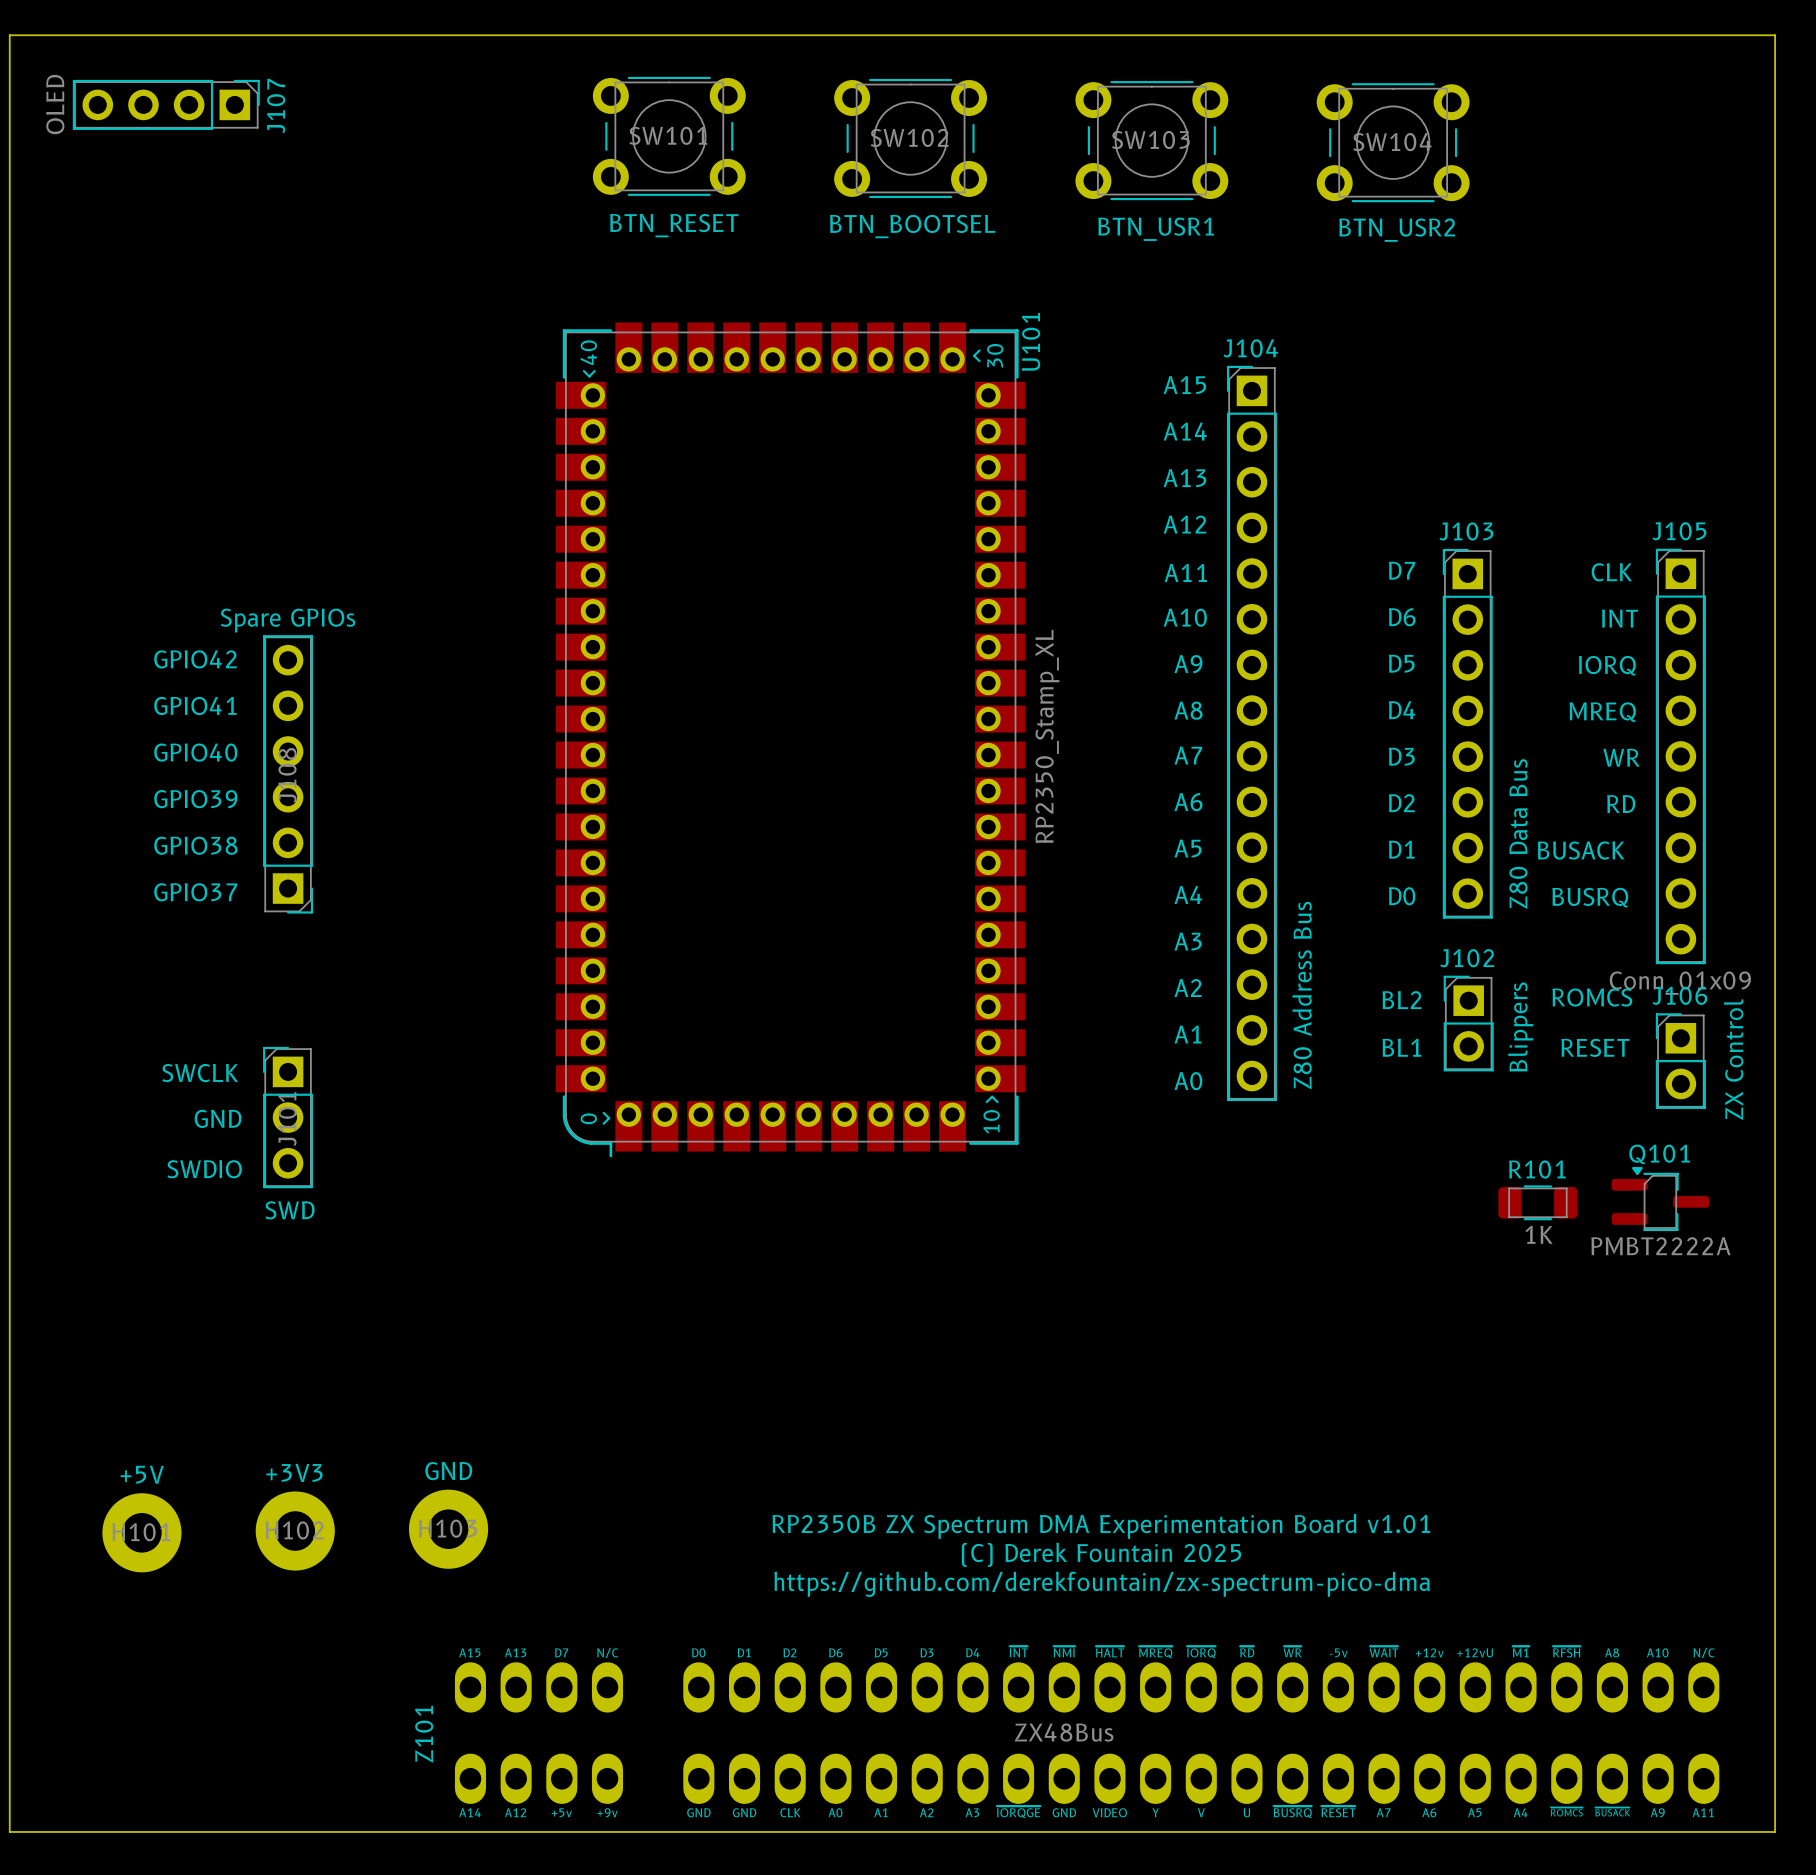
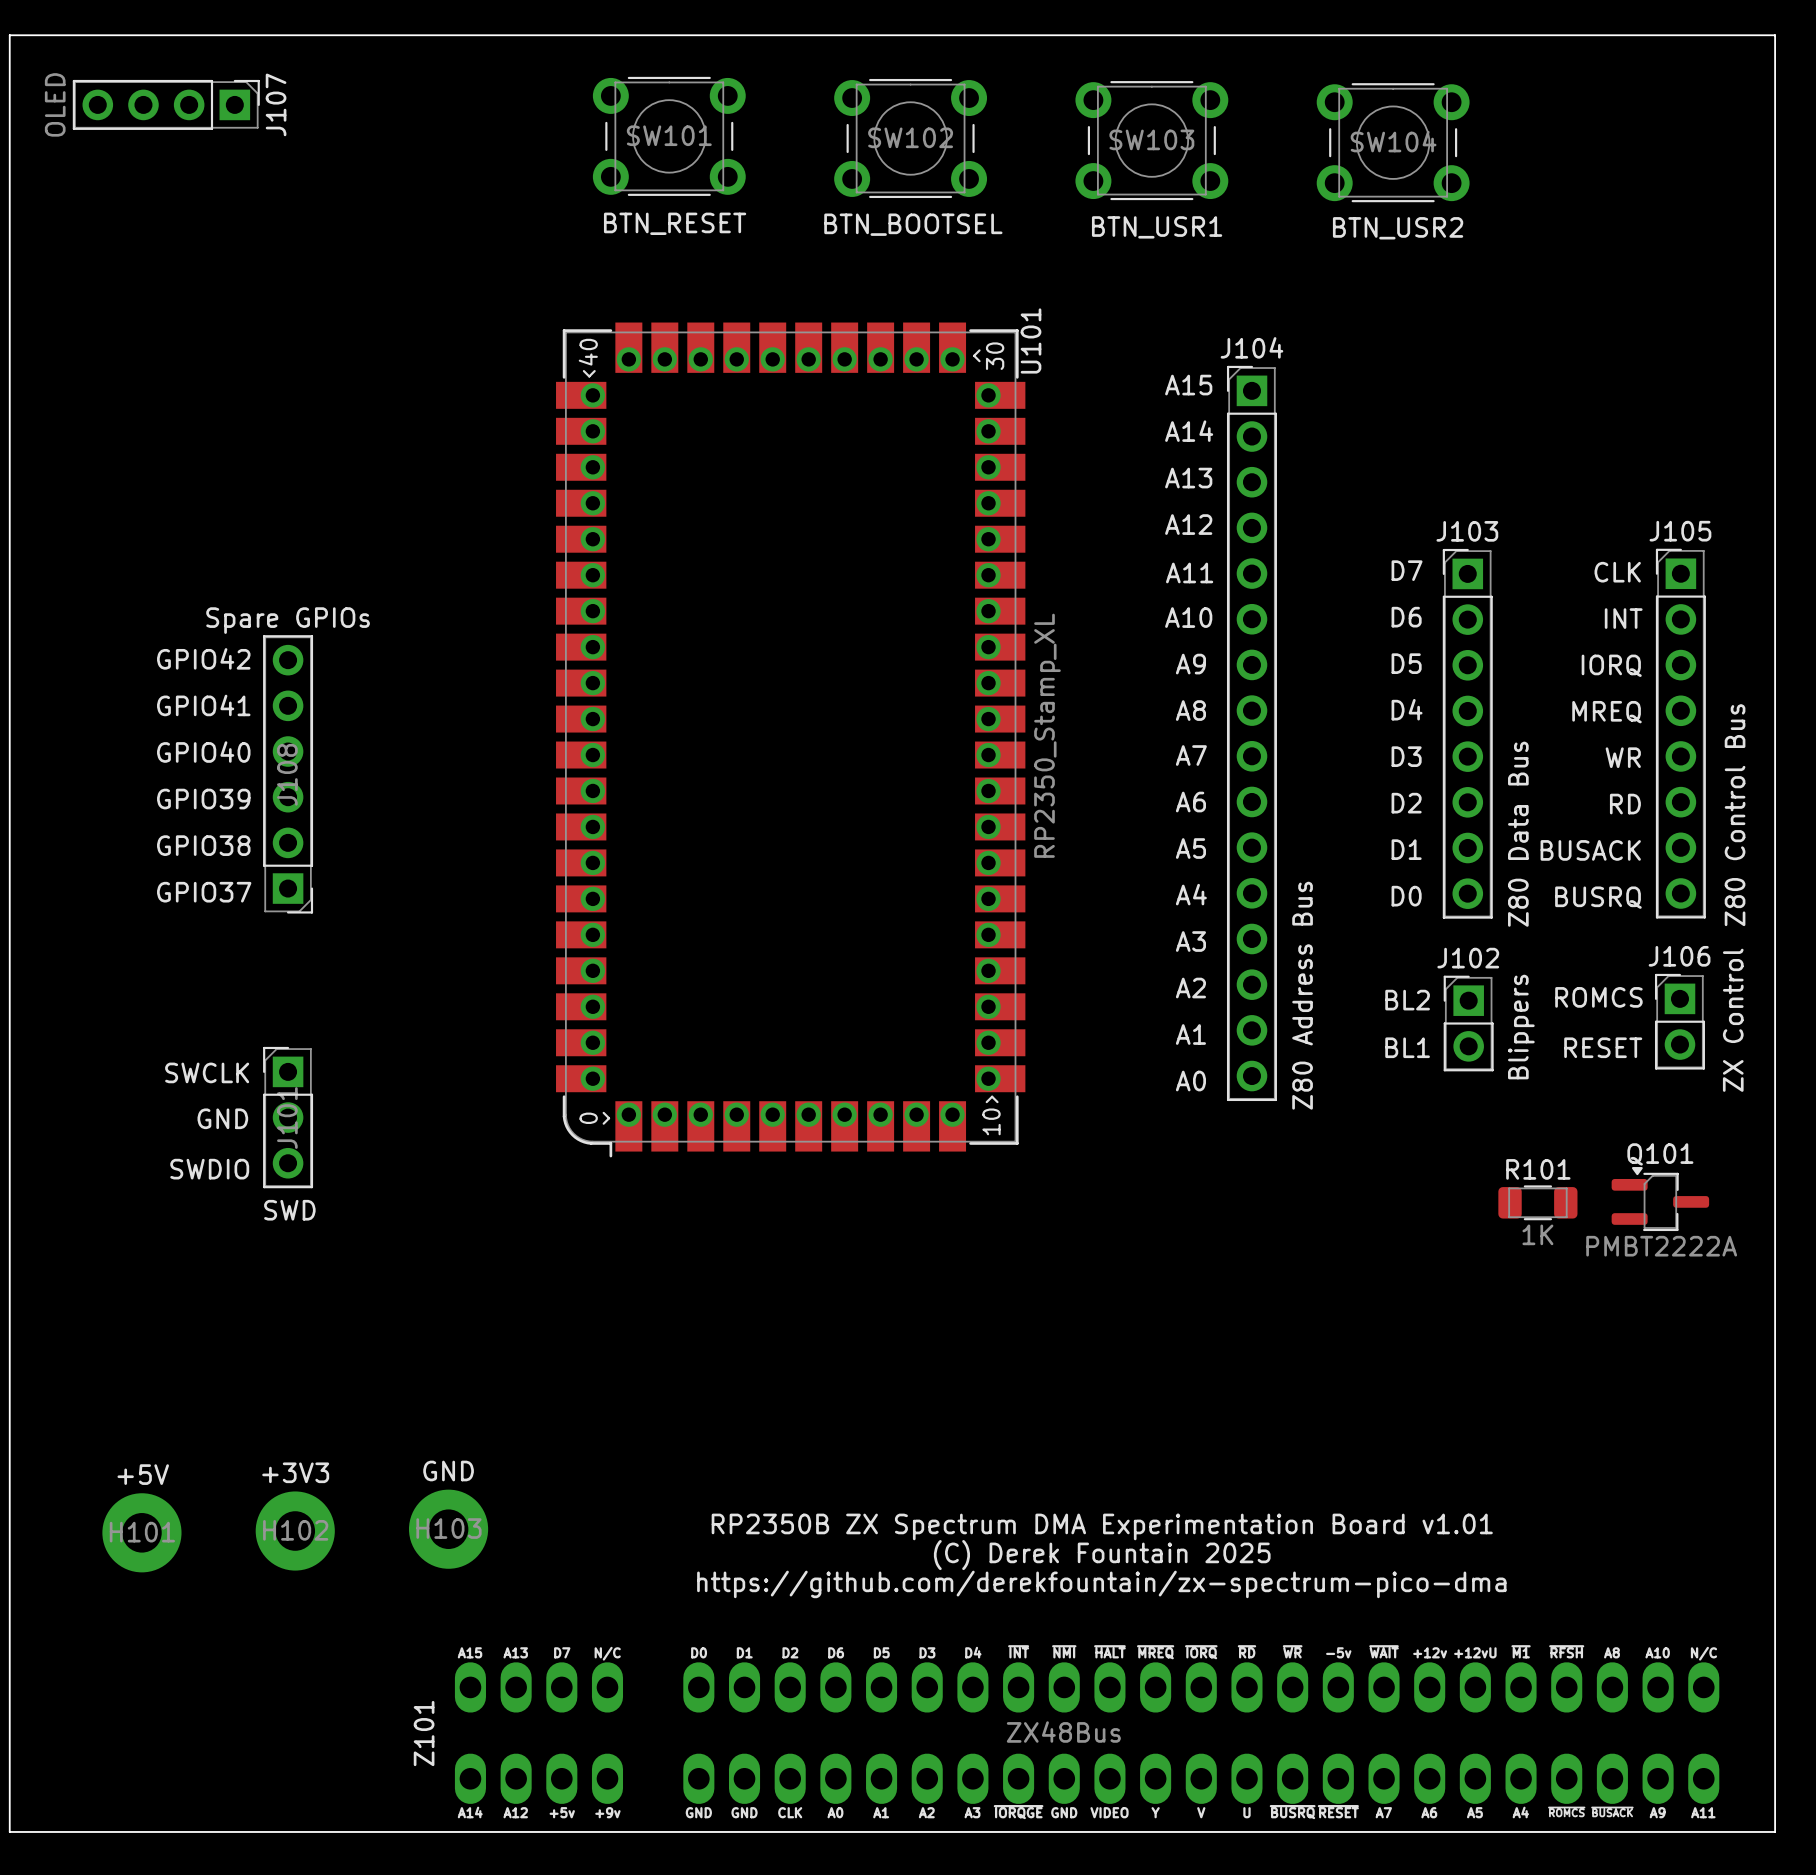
J105 footprint: [1655, 548, 1706, 965] -> [1655, 548, 1706, 919]
J105 value: Conn_01x09 (1680, 983) -> Z80 Control Bus (1735, 815)
J106 position: (1680, 1061) -> (1679, 1021)

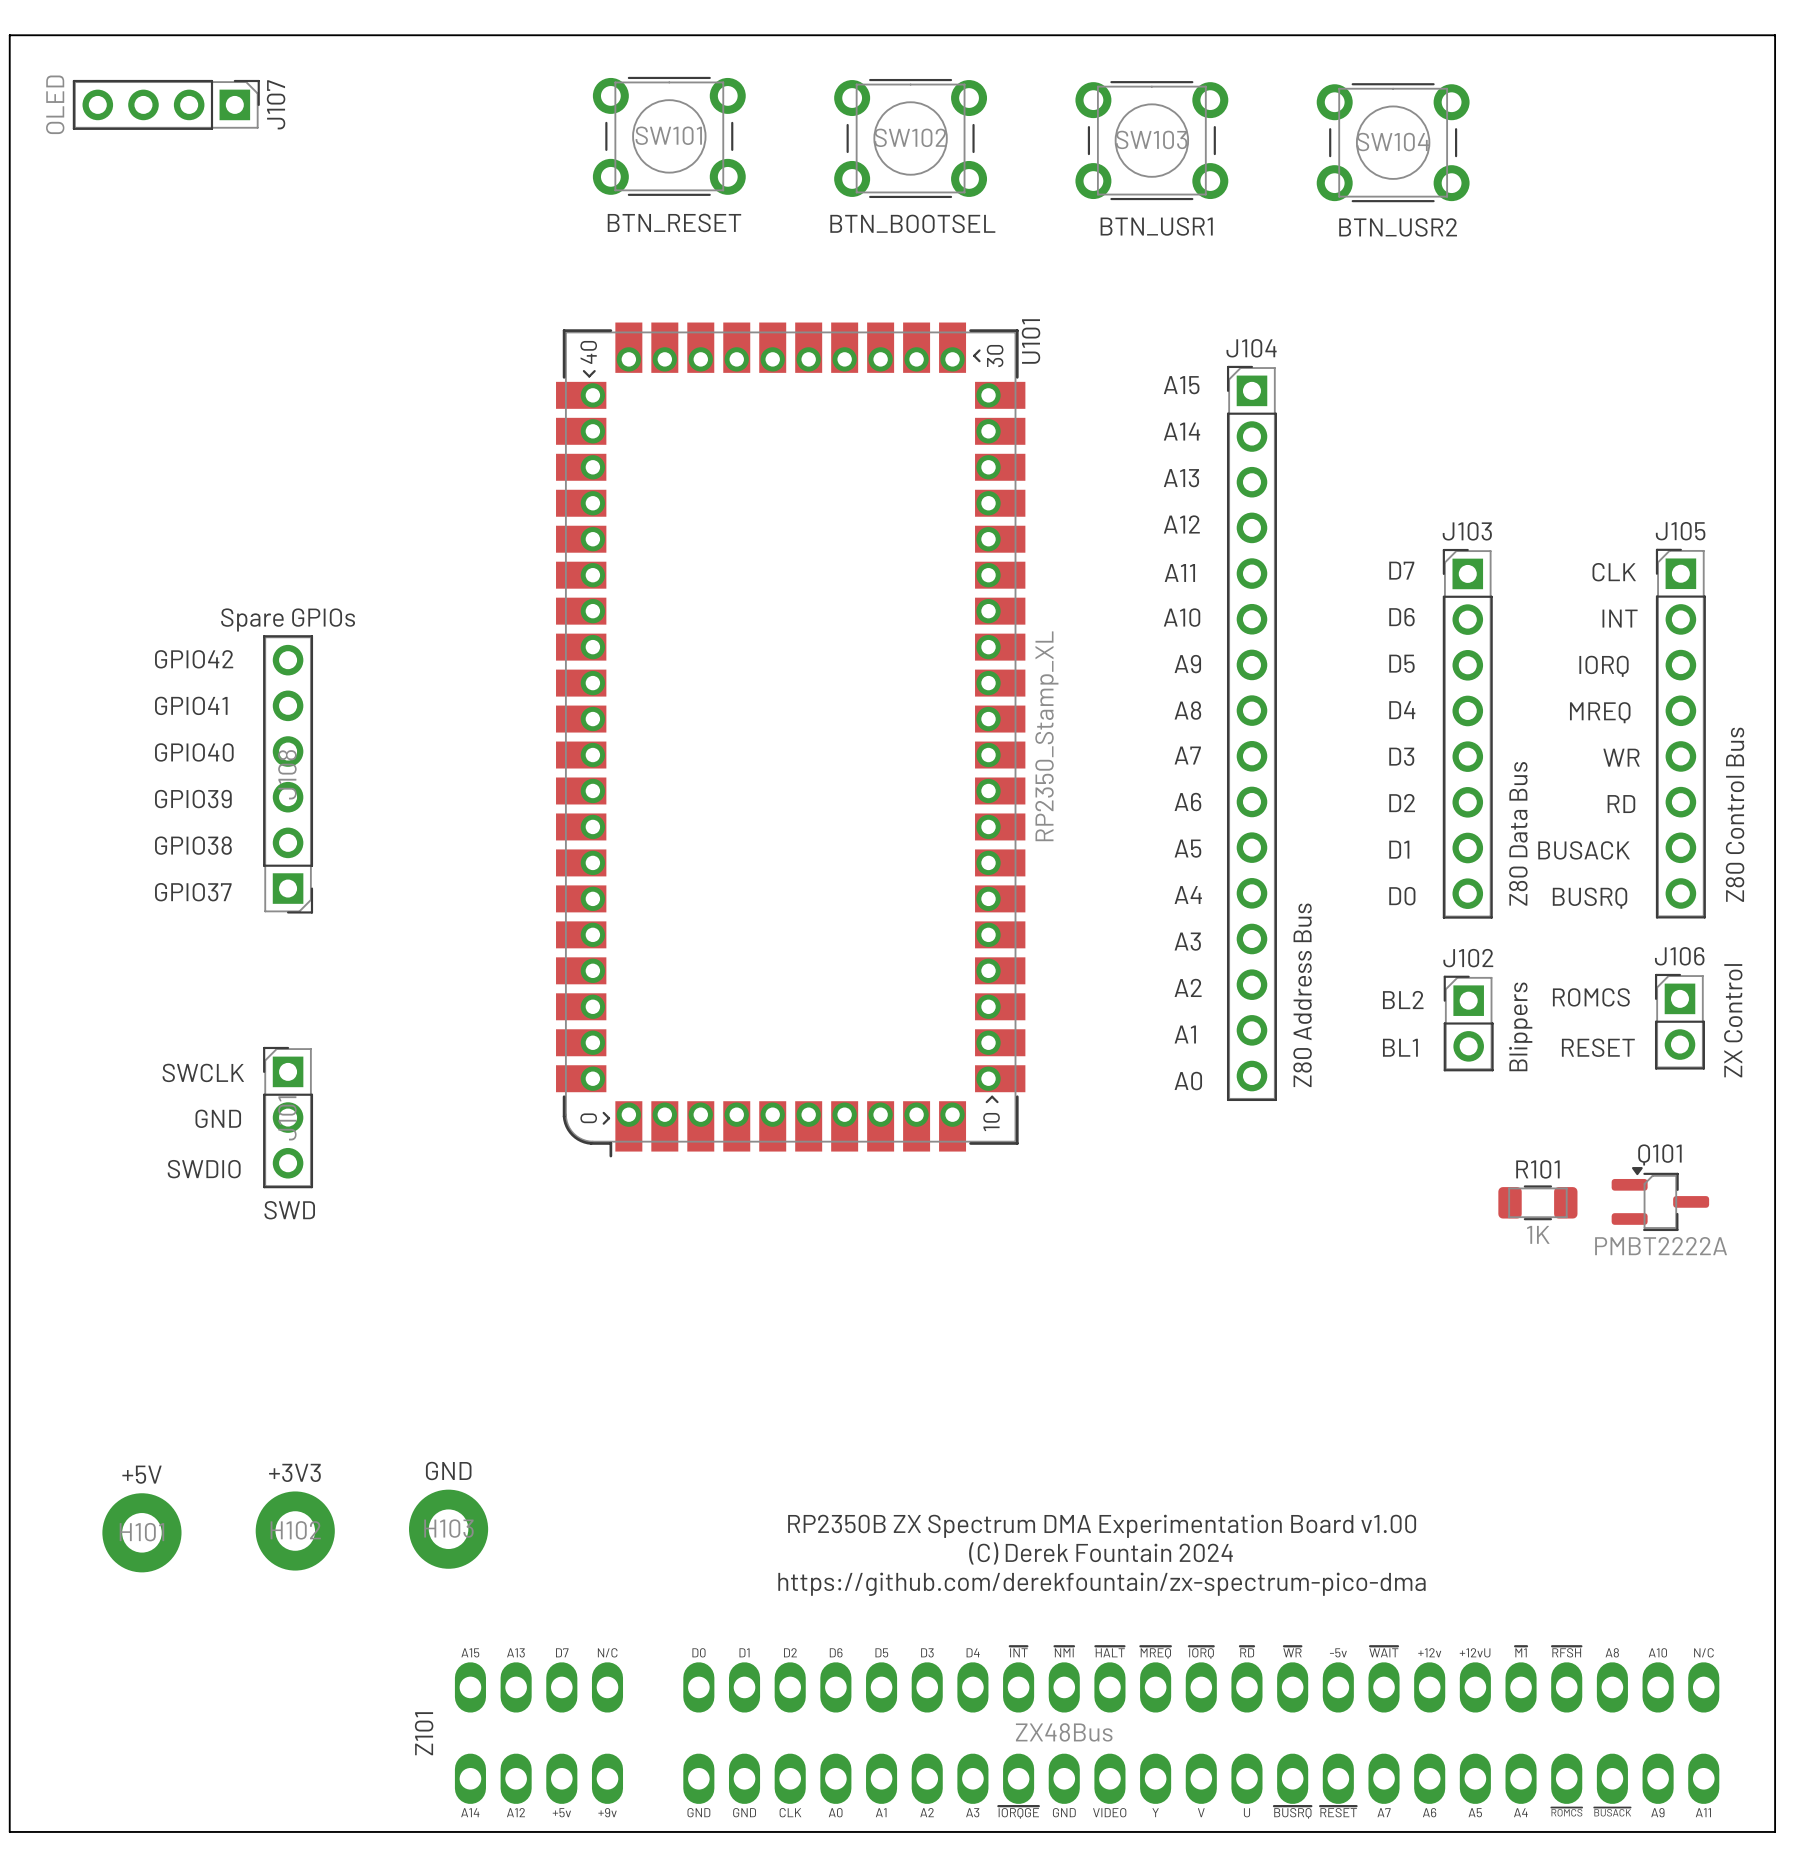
text: RP2350B ZX Spectrum DMA Experimentation Board v1.01 (1102, 1526) -> RP2350B ZX Spectrum DMA Experimentation Board v1.00 (1102, 1526)
text: (C) Derek Fountain 2025 (1102, 1555) -> (C) Derek Fountain 2024 (1100, 1553)

